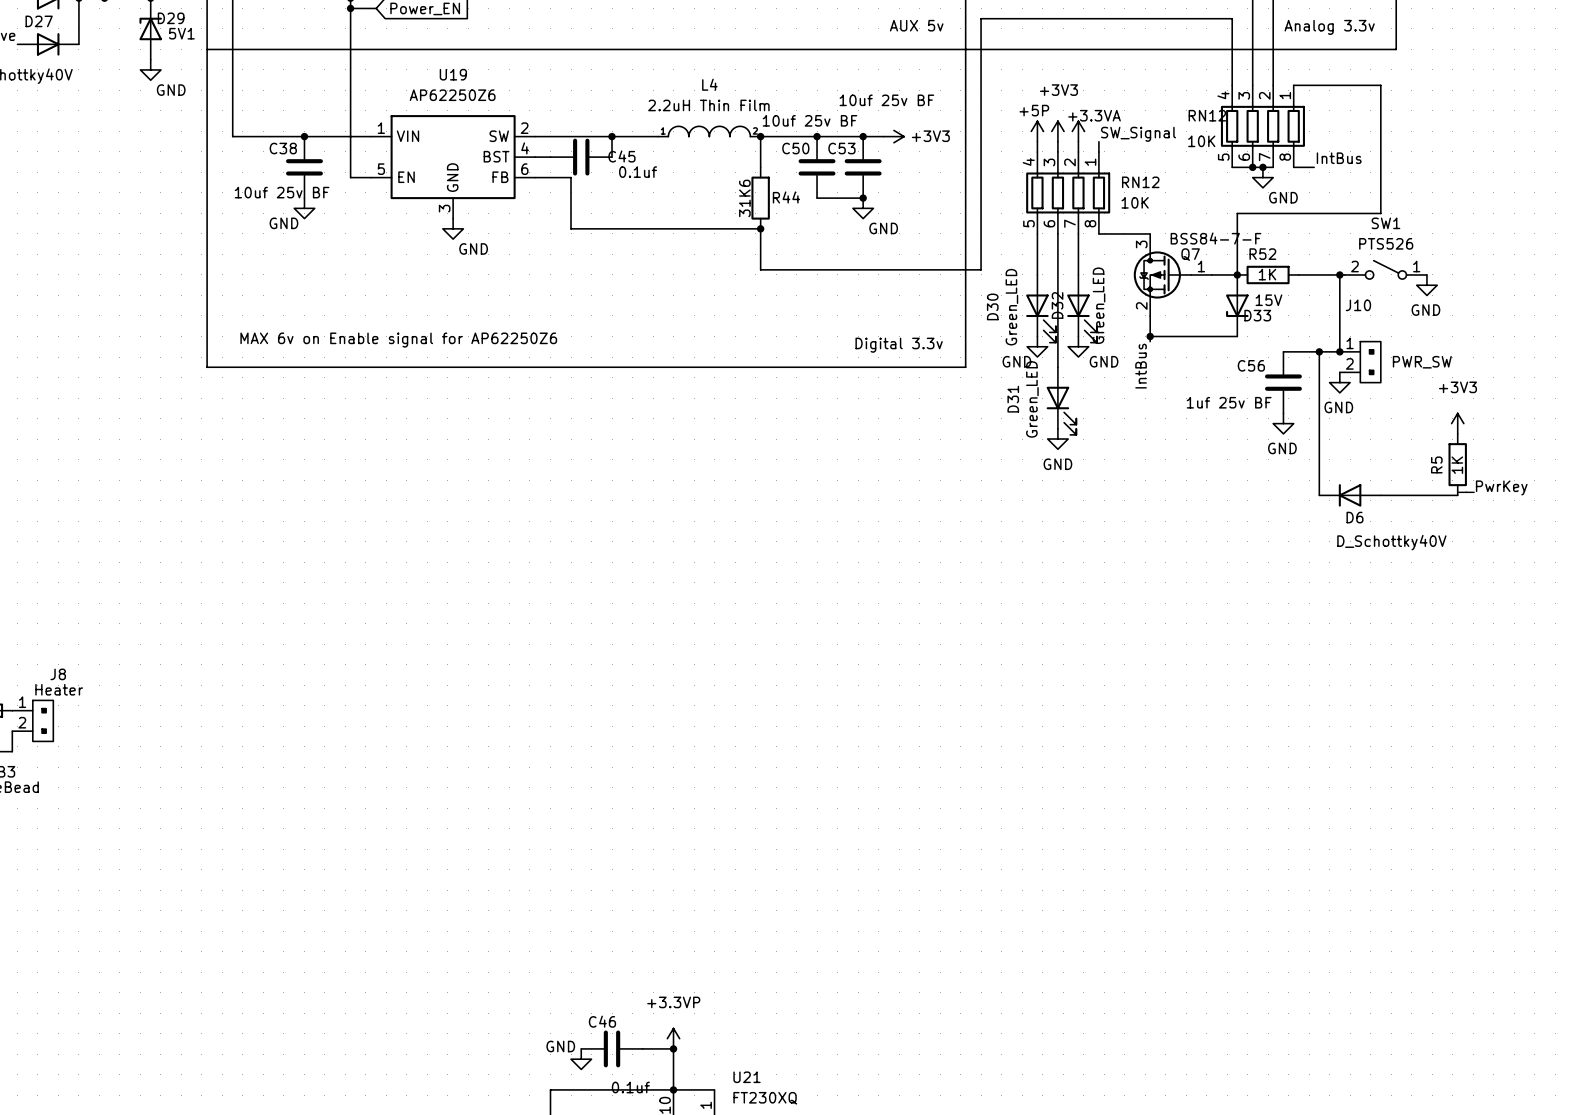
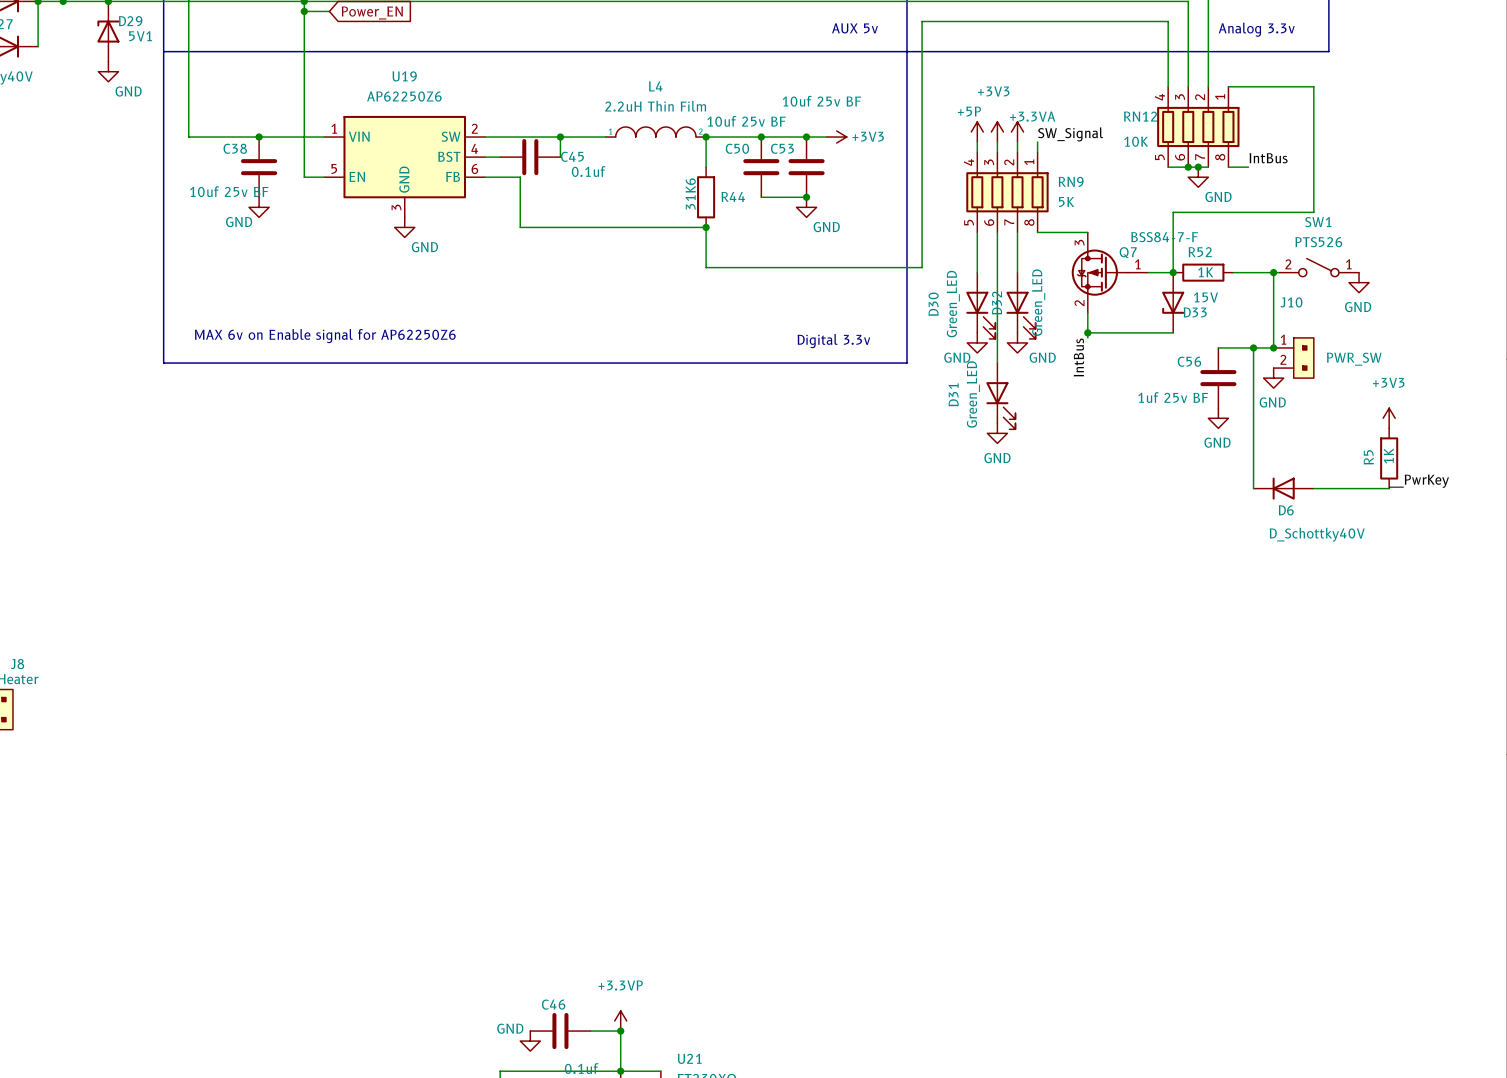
RN12 name: RN12 (1140, 182) -> RN9 (1071, 181)
RN12 value: 10K (1135, 202) -> 5K (1066, 201)

